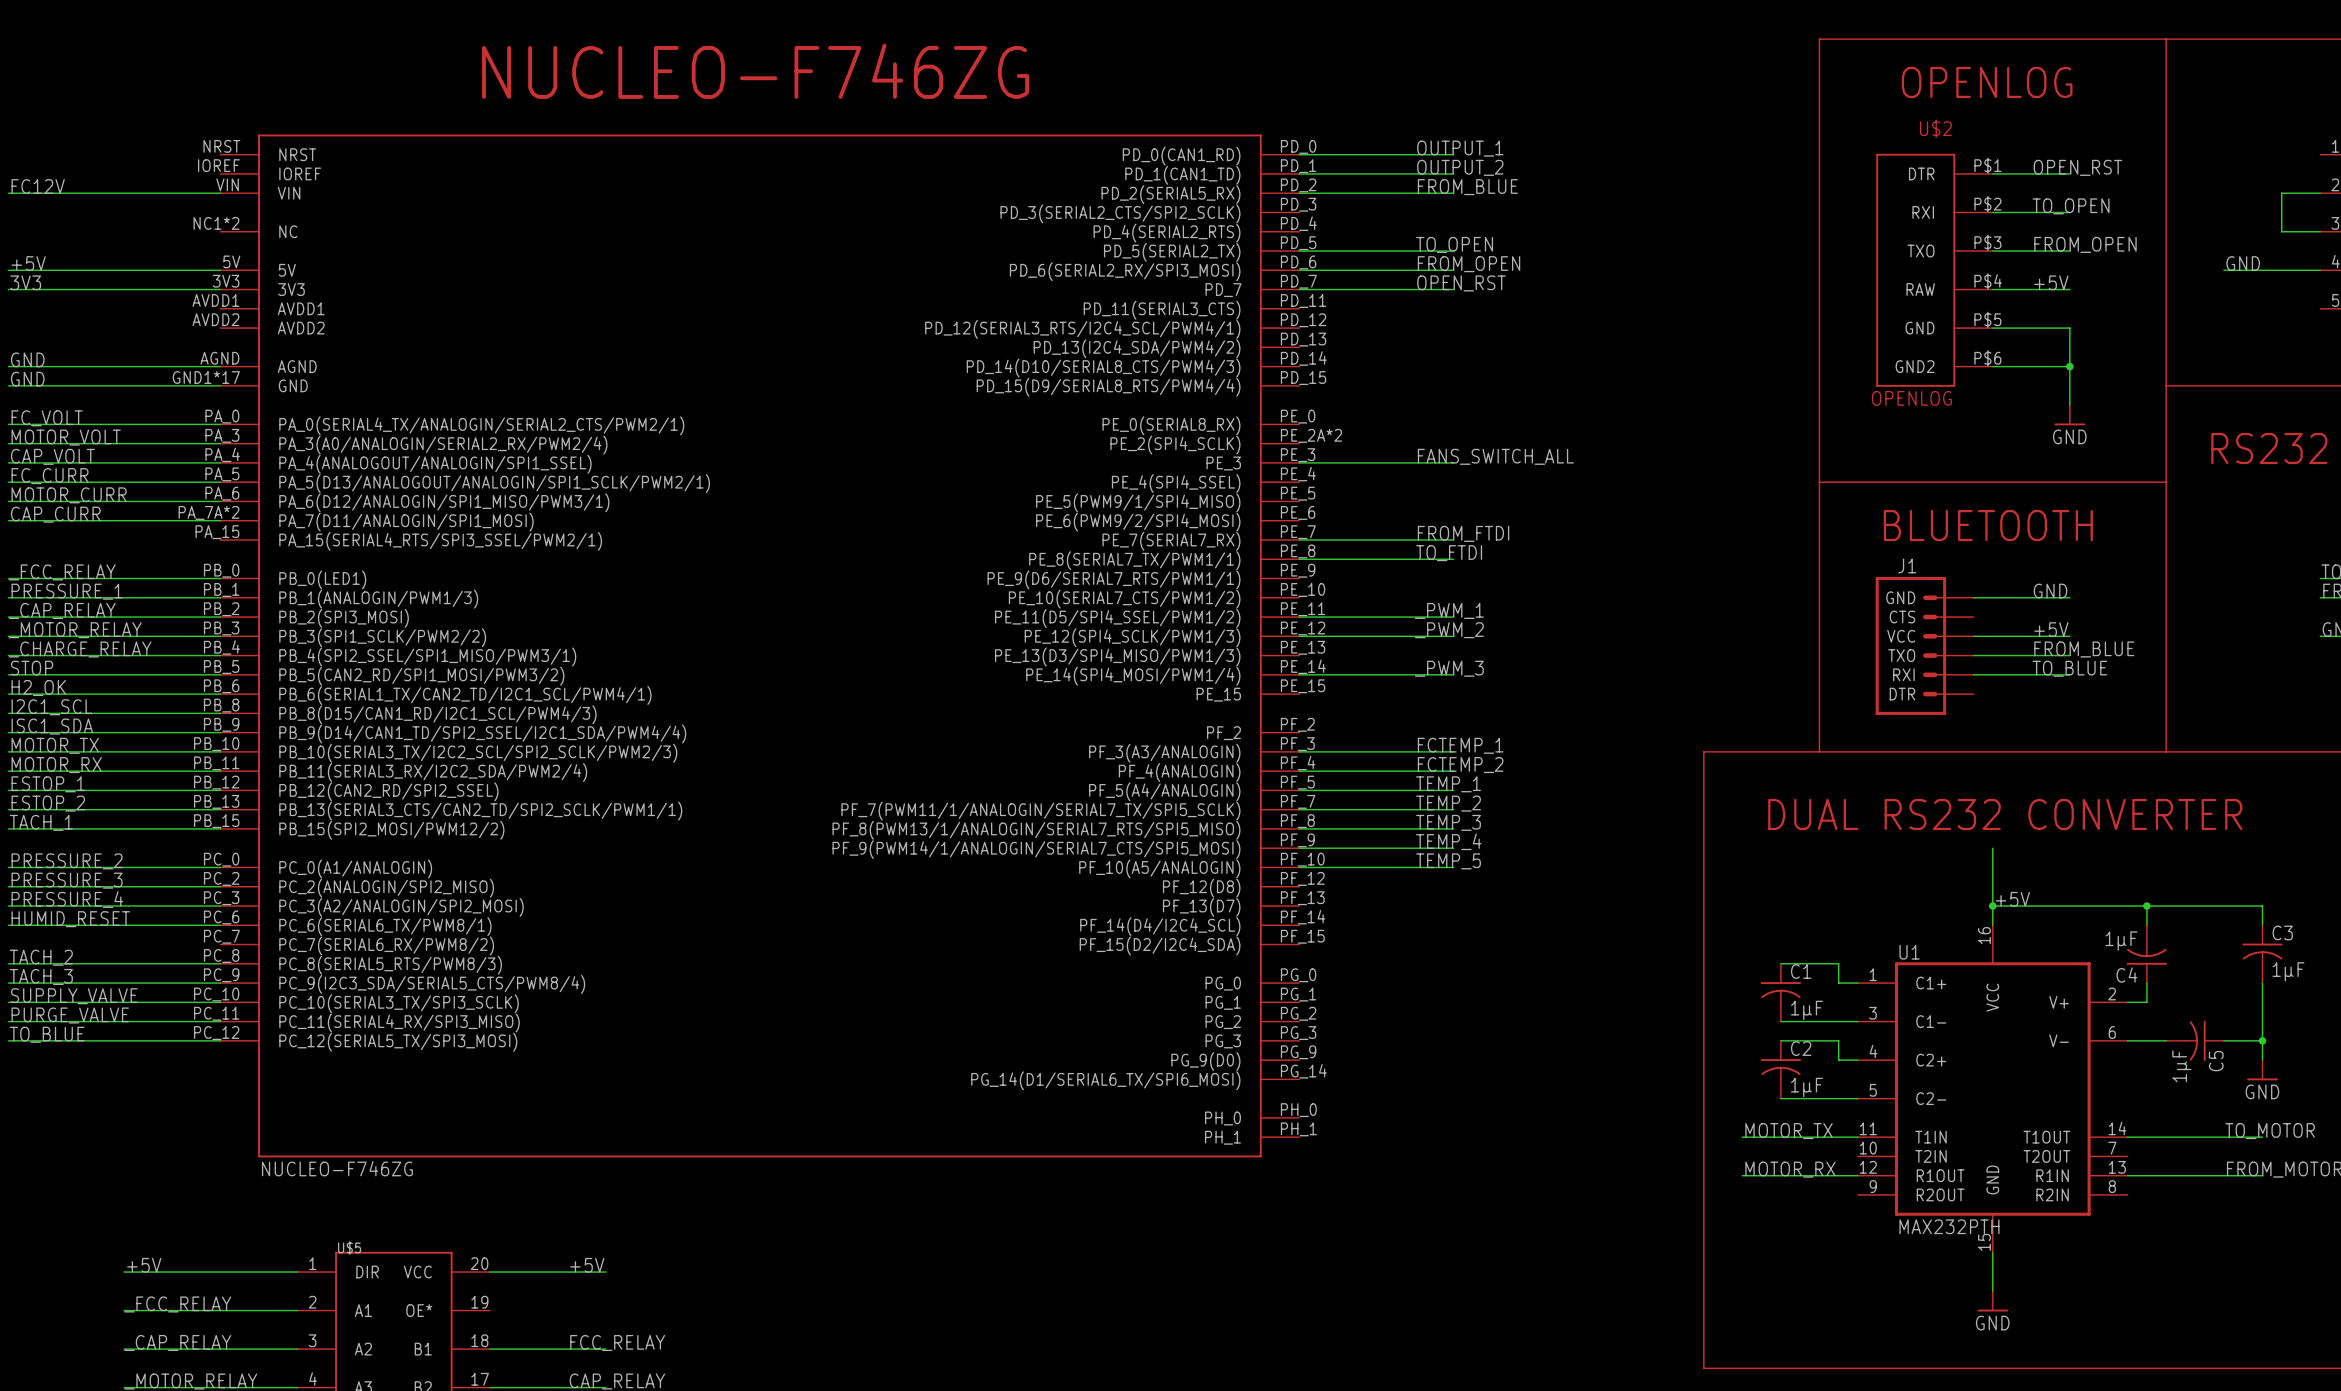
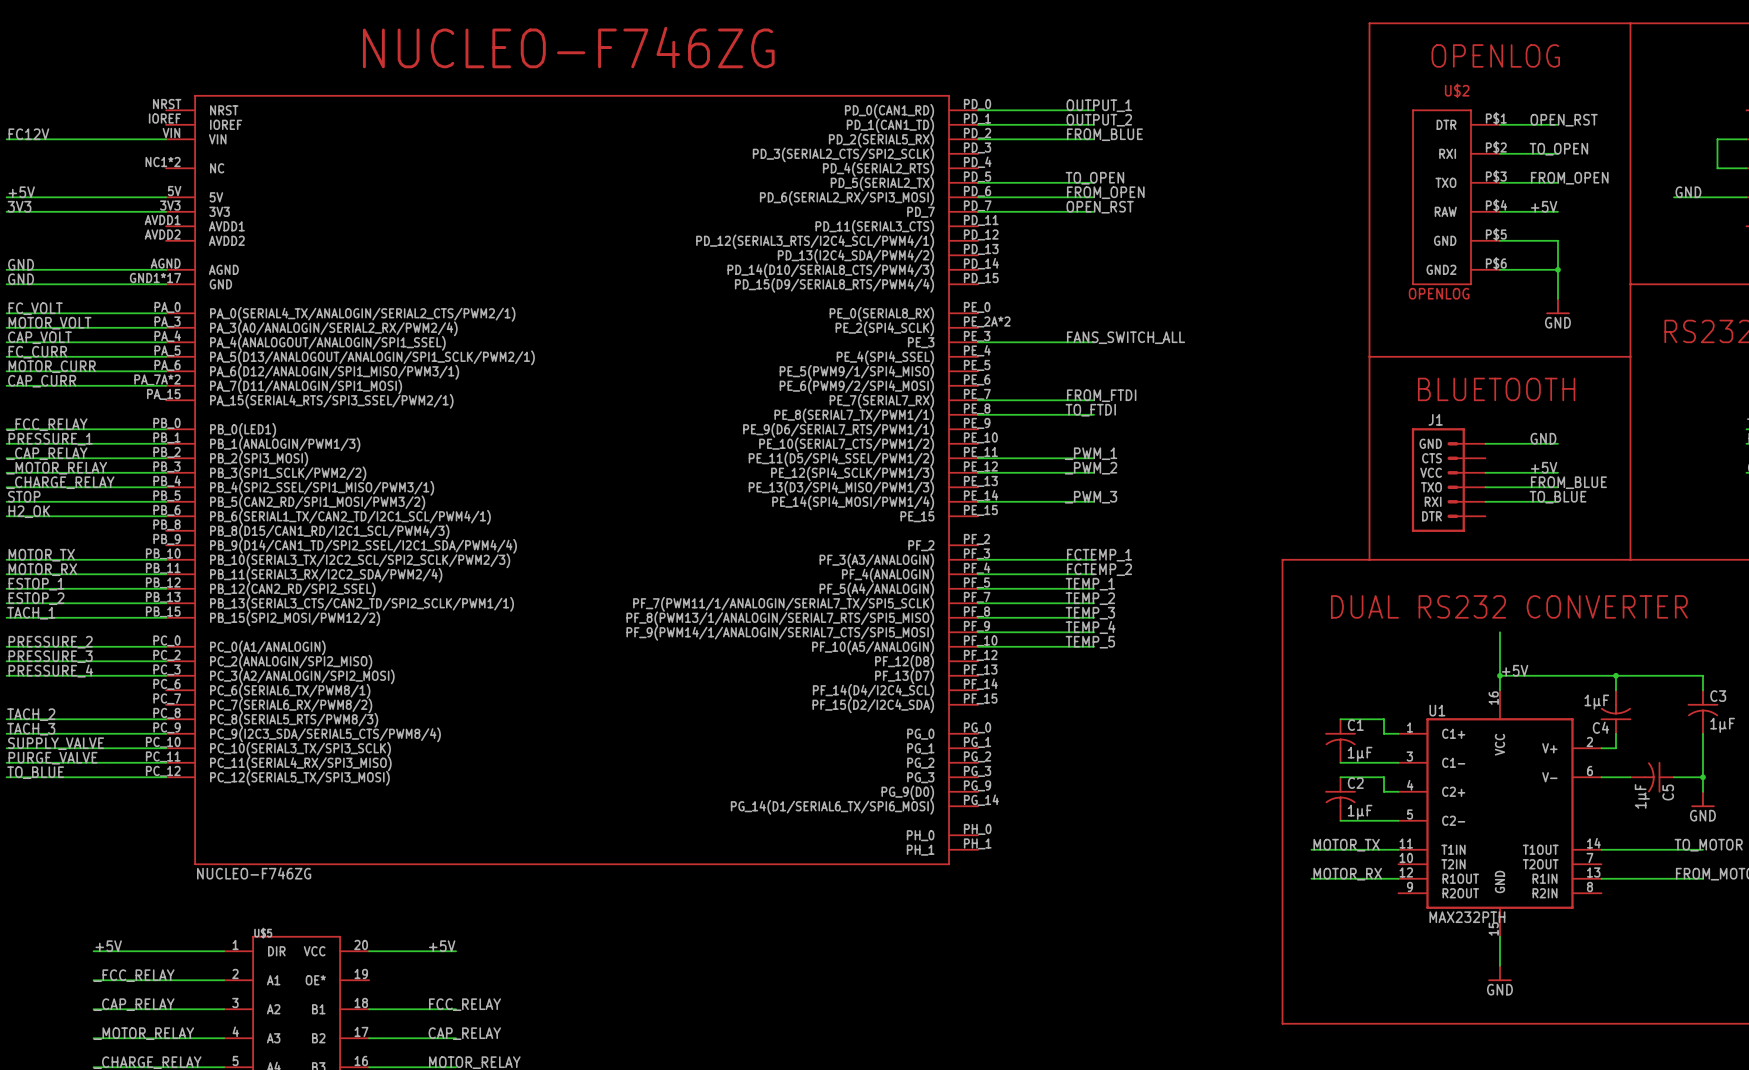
label: I2C1_SCL (52, 707) -> none
wire: (8, 713) (220, 713) -> none
label: ISC1_SDA (52, 726) -> none
wire: (8, 732) (220, 732) -> none
label: HUMID_RESET (70, 919) -> none
wire: (8, 925) (220, 925) -> none

